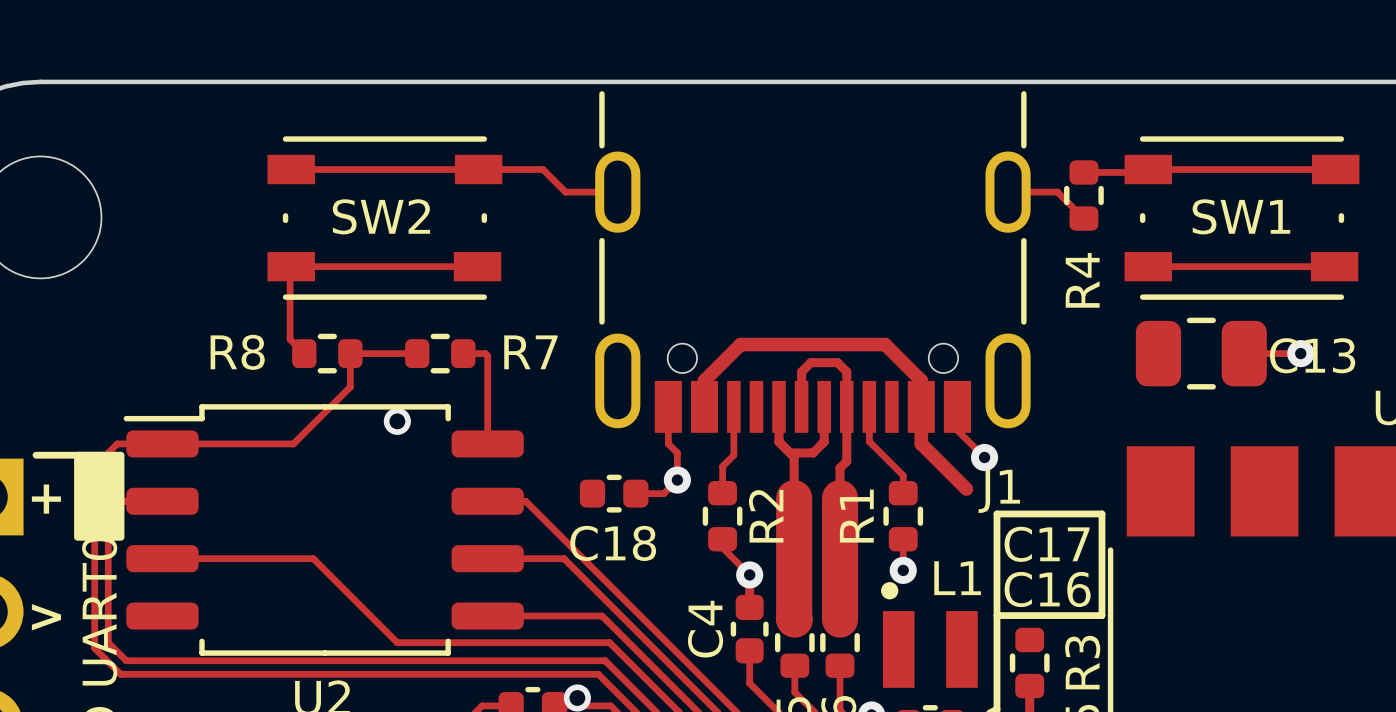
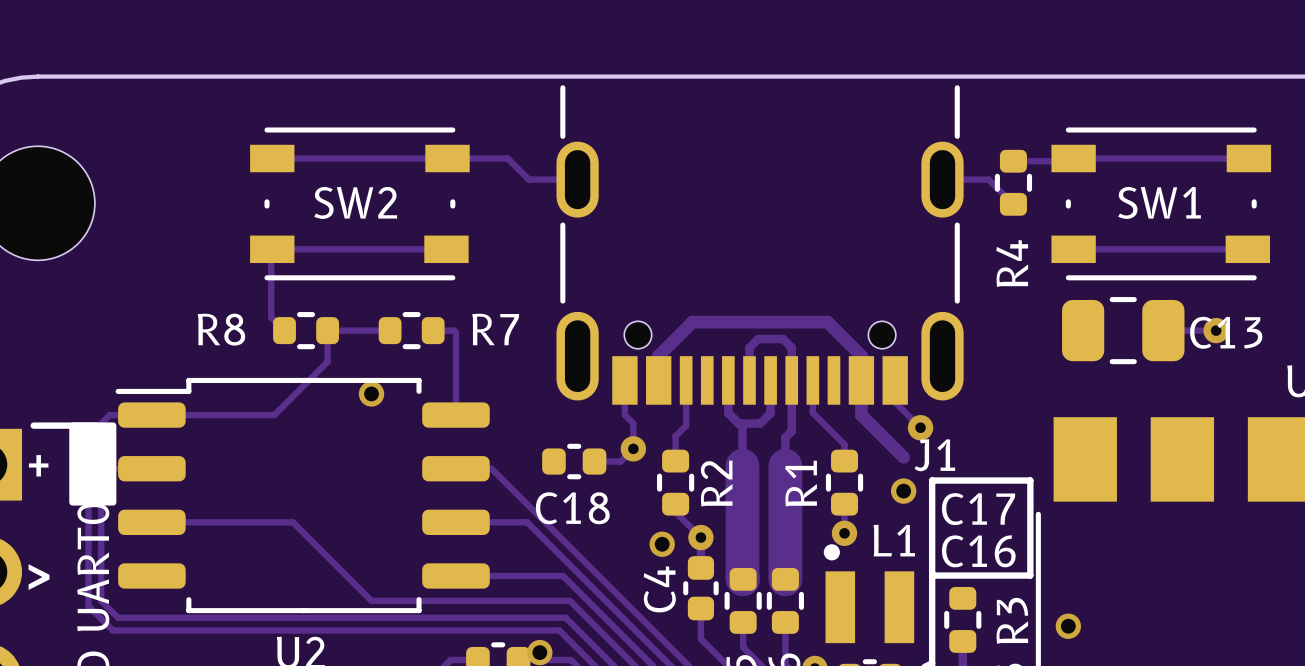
via: none -> (903, 491)
via: none -> (662, 544)
via: none -> (1068, 626)

